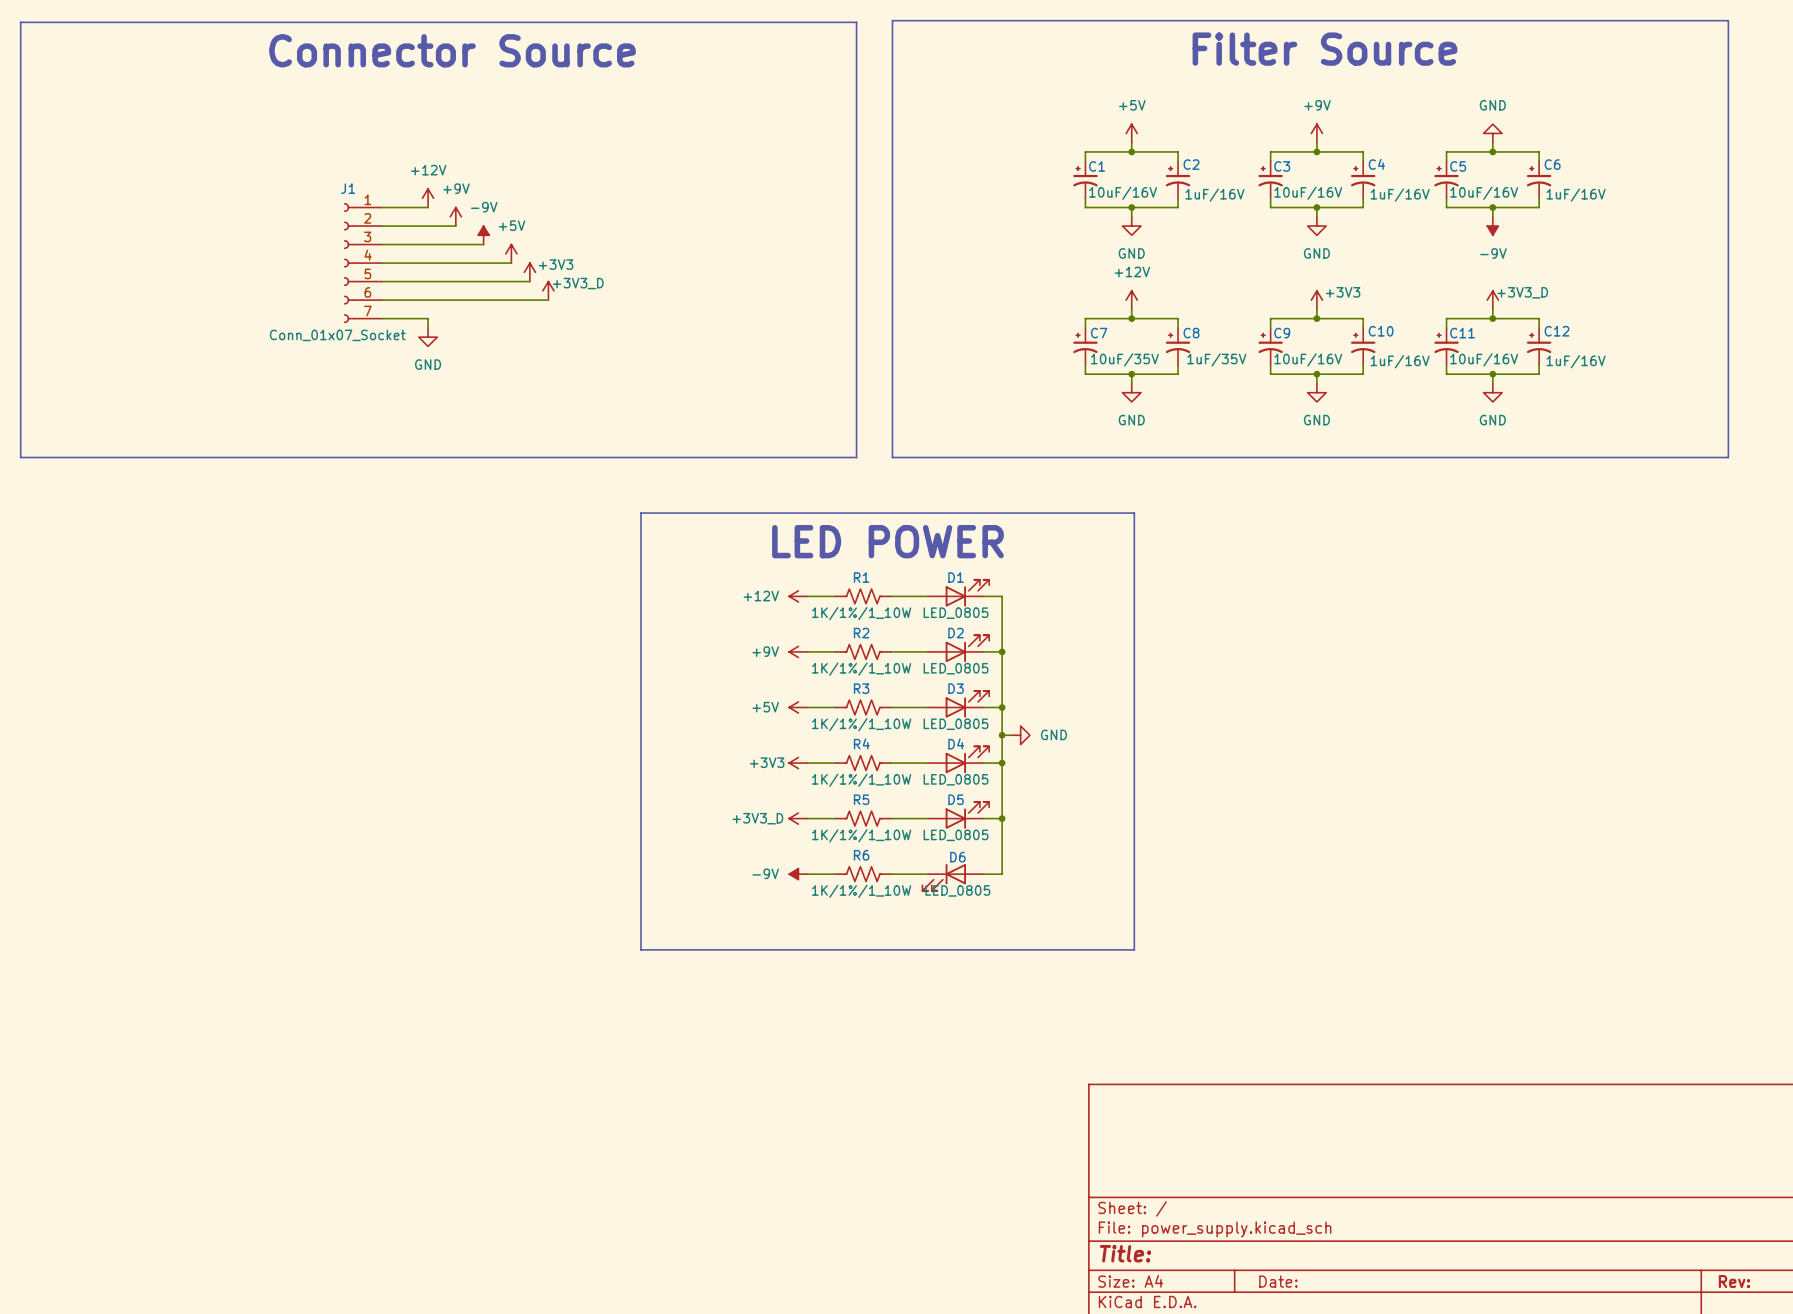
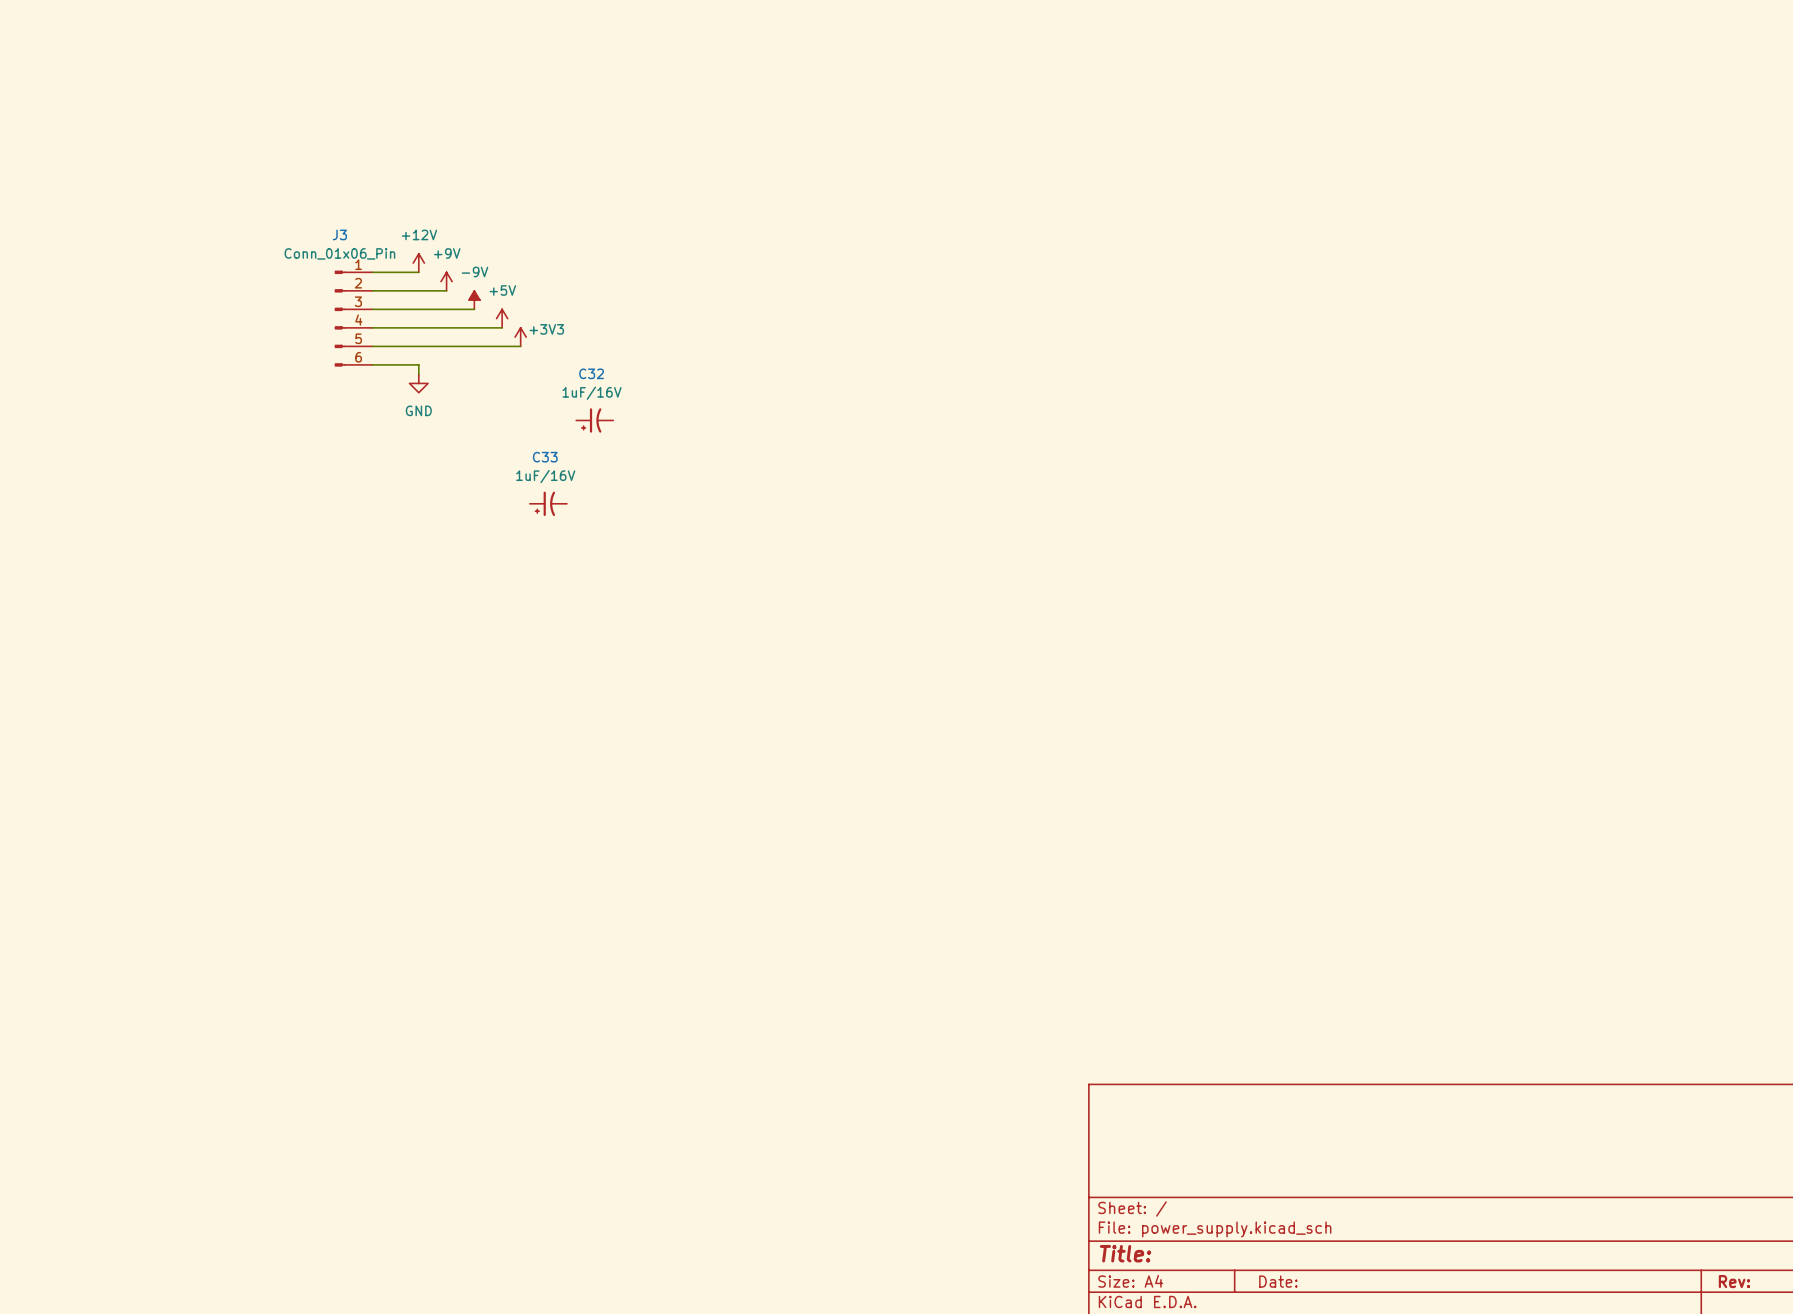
line: (892, 20) (1728, 20) (1728, 457) (892, 457) (892, 20) -> none
line: (20, 22) (856, 22) (856, 457) (20, 457) (20, 22) -> none
text: Filter Source (1324, 49) -> none
text: Connector Source (452, 50) -> none
power symbol: +5V (1131, 133) -> none
power symbol: +9V (1316, 133) -> none
power symbol: GND (1492, 133) -> none
wire: (1131, 142) (1131, 151) -> none
wire: (1316, 142) (1316, 151) -> none
wire: (1492, 142) (1492, 151) -> none
junction: (1131, 151) -> none
junction: (1316, 151) -> none
junction: (1492, 151) -> none
wire: (1085, 161) (1085, 151) (1178, 151) (1178, 161) -> none
wire: (1270, 161) (1270, 151) (1363, 151) (1363, 161) -> none
wire: (1446, 161) (1446, 151) (1539, 151) (1539, 161) -> none
C1: 10uF/16V (1085, 179) -> none
C2: 1uF/16V (1178, 179) -> none
C3: 10uF/16V (1270, 179) -> none
C4: 1uF/16V (1363, 179) -> none
C5: 10uF/16V (1446, 179) -> none
C6: 1uF/16V (1539, 179) -> none
power symbol position: +12V (428, 198) -> +12V (418, 263)
wire: (1085, 198) (1085, 207) (1178, 207) (1178, 198) -> none
wire: (1270, 198) (1270, 207) (1363, 207) (1363, 198) -> none
wire: (1446, 198) (1446, 207) (1539, 207) (1539, 198) -> none
wire: (381, 207) (428, 207) -> (372, 272) (418, 272)
wire: (1131, 207) (1131, 216) -> none
junction: (1131, 207) -> none
wire: (1316, 207) (1316, 216) -> none
junction: (1316, 207) -> none
wire: (1492, 207) (1492, 216) -> none
junction: (1492, 207) -> none
power symbol position: +9V (455, 216) -> +9V (446, 281)
wire: (381, 226) (455, 226) -> (372, 290) (446, 290)
power symbol: GND (1131, 226) -> none
power symbol: GND (1316, 226) -> none
power symbol: -9V (1492, 226) -> none
power symbol position: -9V (483, 235) -> -9V (474, 300)
wire: (381, 244) (483, 244) -> (372, 309) (474, 309)
power symbol position: +5V (511, 253) -> +5V (502, 318)
J1: Conn_01x07_Socket (362, 263) -> none
wire: (381, 263) (511, 263) -> (372, 327) (502, 327)
power symbol position: +3V3 (529, 272) -> +3V3 (520, 337)
wire: (381, 281) (529, 281) -> (372, 346) (520, 346)
power symbol: +3V3_D (548, 290) -> none
wire: (381, 300) (548, 300) -> none
power symbol: +12V (1131, 300) -> none
power symbol: +3V3 (1316, 300) -> none
power symbol: +3V3_D (1492, 300) -> none
wire: (1131, 309) (1131, 318) -> none
wire: (1316, 309) (1316, 318) -> none
wire: (1492, 309) (1492, 318) -> none
J3: none -> Conn_01x06_Pin (353, 318)
wire: (381, 318) (428, 318) (428, 327) -> (372, 364) (418, 364) (418, 374)
junction: (1131, 318) -> none
junction: (1316, 318) -> none
junction: (1492, 318) -> none
wire: (1085, 327) (1085, 318) (1178, 318) (1178, 327) -> none
wire: (1270, 327) (1270, 318) (1363, 318) (1363, 327) -> none
wire: (1446, 327) (1446, 318) (1539, 318) (1539, 327) -> none
power symbol position: GND (428, 337) -> GND (418, 383)
C7: 10uF/35V (1085, 346) -> none
C8: 1uF/35V (1178, 346) -> none
C9: 10uF/16V (1270, 346) -> none
C10: 1uF/16V (1363, 346) -> none
C11: 10uF/16V (1446, 346) -> none
C12: 1uF/16V (1539, 346) -> none
wire: (1085, 364) (1085, 374) (1178, 374) (1178, 364) -> none
wire: (1270, 364) (1270, 374) (1363, 374) (1363, 364) -> none
wire: (1446, 364) (1446, 374) (1539, 374) (1539, 364) -> none
wire: (1131, 374) (1131, 383) -> none
junction: (1131, 374) -> none
wire: (1316, 374) (1316, 383) -> none
junction: (1316, 374) -> none
wire: (1492, 374) (1492, 383) -> none
junction: (1492, 374) -> none
power symbol: GND (1131, 392) -> none
power symbol: GND (1316, 392) -> none
power symbol: GND (1492, 392) -> none
C32: none -> 1uF/16V (594, 420)
C33: none -> 1uF/16V (548, 503)
line: (641, 513) (1134, 513) (1134, 949) (641, 949) (641, 513) -> none
text: LED POWER (887, 541) -> none
D1: LED_0805 (958, 593) -> none
power symbol: +12V (798, 596) -> none
wire: (807, 596) (835, 596) -> none
R1: 1K/1%/1_10W (863, 596) -> none
wire: (891, 596) (928, 596) -> none
wire: (983, 596) (1002, 596) (1002, 874) (983, 874) -> none
D2: LED_0805 (958, 648) -> none
power symbol: +9V (798, 651) -> none
wire: (807, 651) (835, 651) -> none
R2: 1K/1%/1_10W (863, 651) -> none
wire: (891, 651) (928, 651) -> none
wire: (983, 651) (1002, 651) -> none
junction: (1002, 651) -> none
D3: LED_0805 (958, 704) -> none
power symbol: +5V (798, 707) -> none
wire: (807, 707) (835, 707) -> none
R3: 1K/1%/1_10W (863, 707) -> none
wire: (891, 707) (928, 707) -> none
wire: (983, 707) (1002, 707) -> none
junction: (1002, 707) -> none
wire: (1002, 735) (1011, 735) -> none
junction: (1002, 735) -> none
power symbol: GND (1020, 735) -> none
D4: LED_0805 (958, 759) -> none
power symbol: +3V3 (798, 763) -> none
wire: (807, 763) (835, 763) -> none
R4: 1K/1%/1_10W (863, 763) -> none
wire: (891, 763) (928, 763) -> none
wire: (983, 763) (1002, 763) -> none
junction: (1002, 763) -> none
D5: LED_0805 (958, 815) -> none
power symbol: +3V3_D (798, 818) -> none
wire: (807, 818) (835, 818) -> none
R5: 1K/1%/1_10W (863, 818) -> none
wire: (891, 818) (928, 818) -> none
wire: (983, 818) (1002, 818) -> none
junction: (1002, 818) -> none
power symbol: -9V (798, 874) -> none
wire: (807, 874) (835, 874) -> none
R6: 1K/1%/1_10W (863, 874) -> none
wire: (891, 874) (928, 874) -> none
D6: LED_0805 (953, 877) -> none

